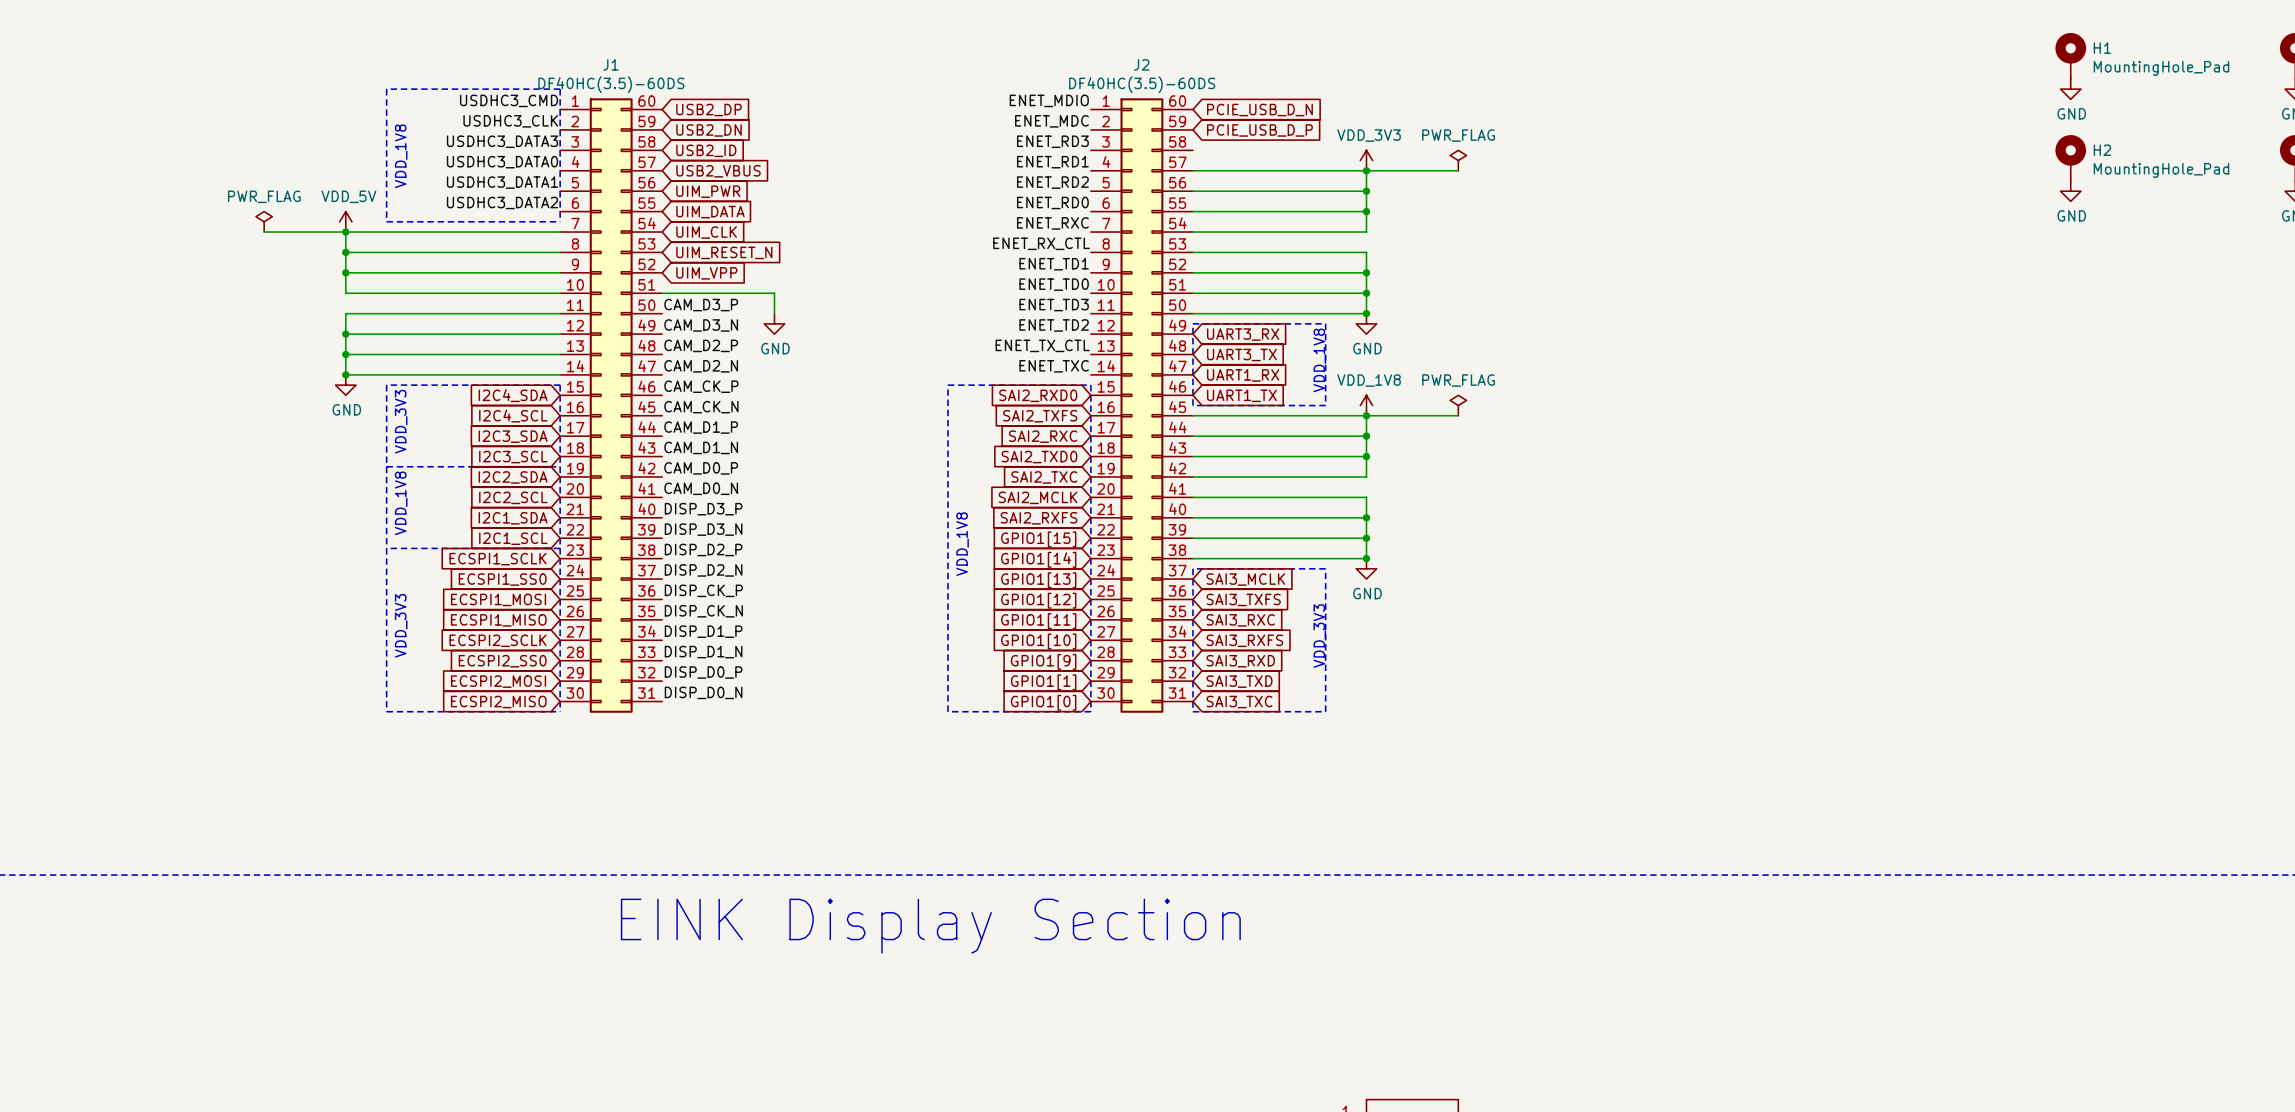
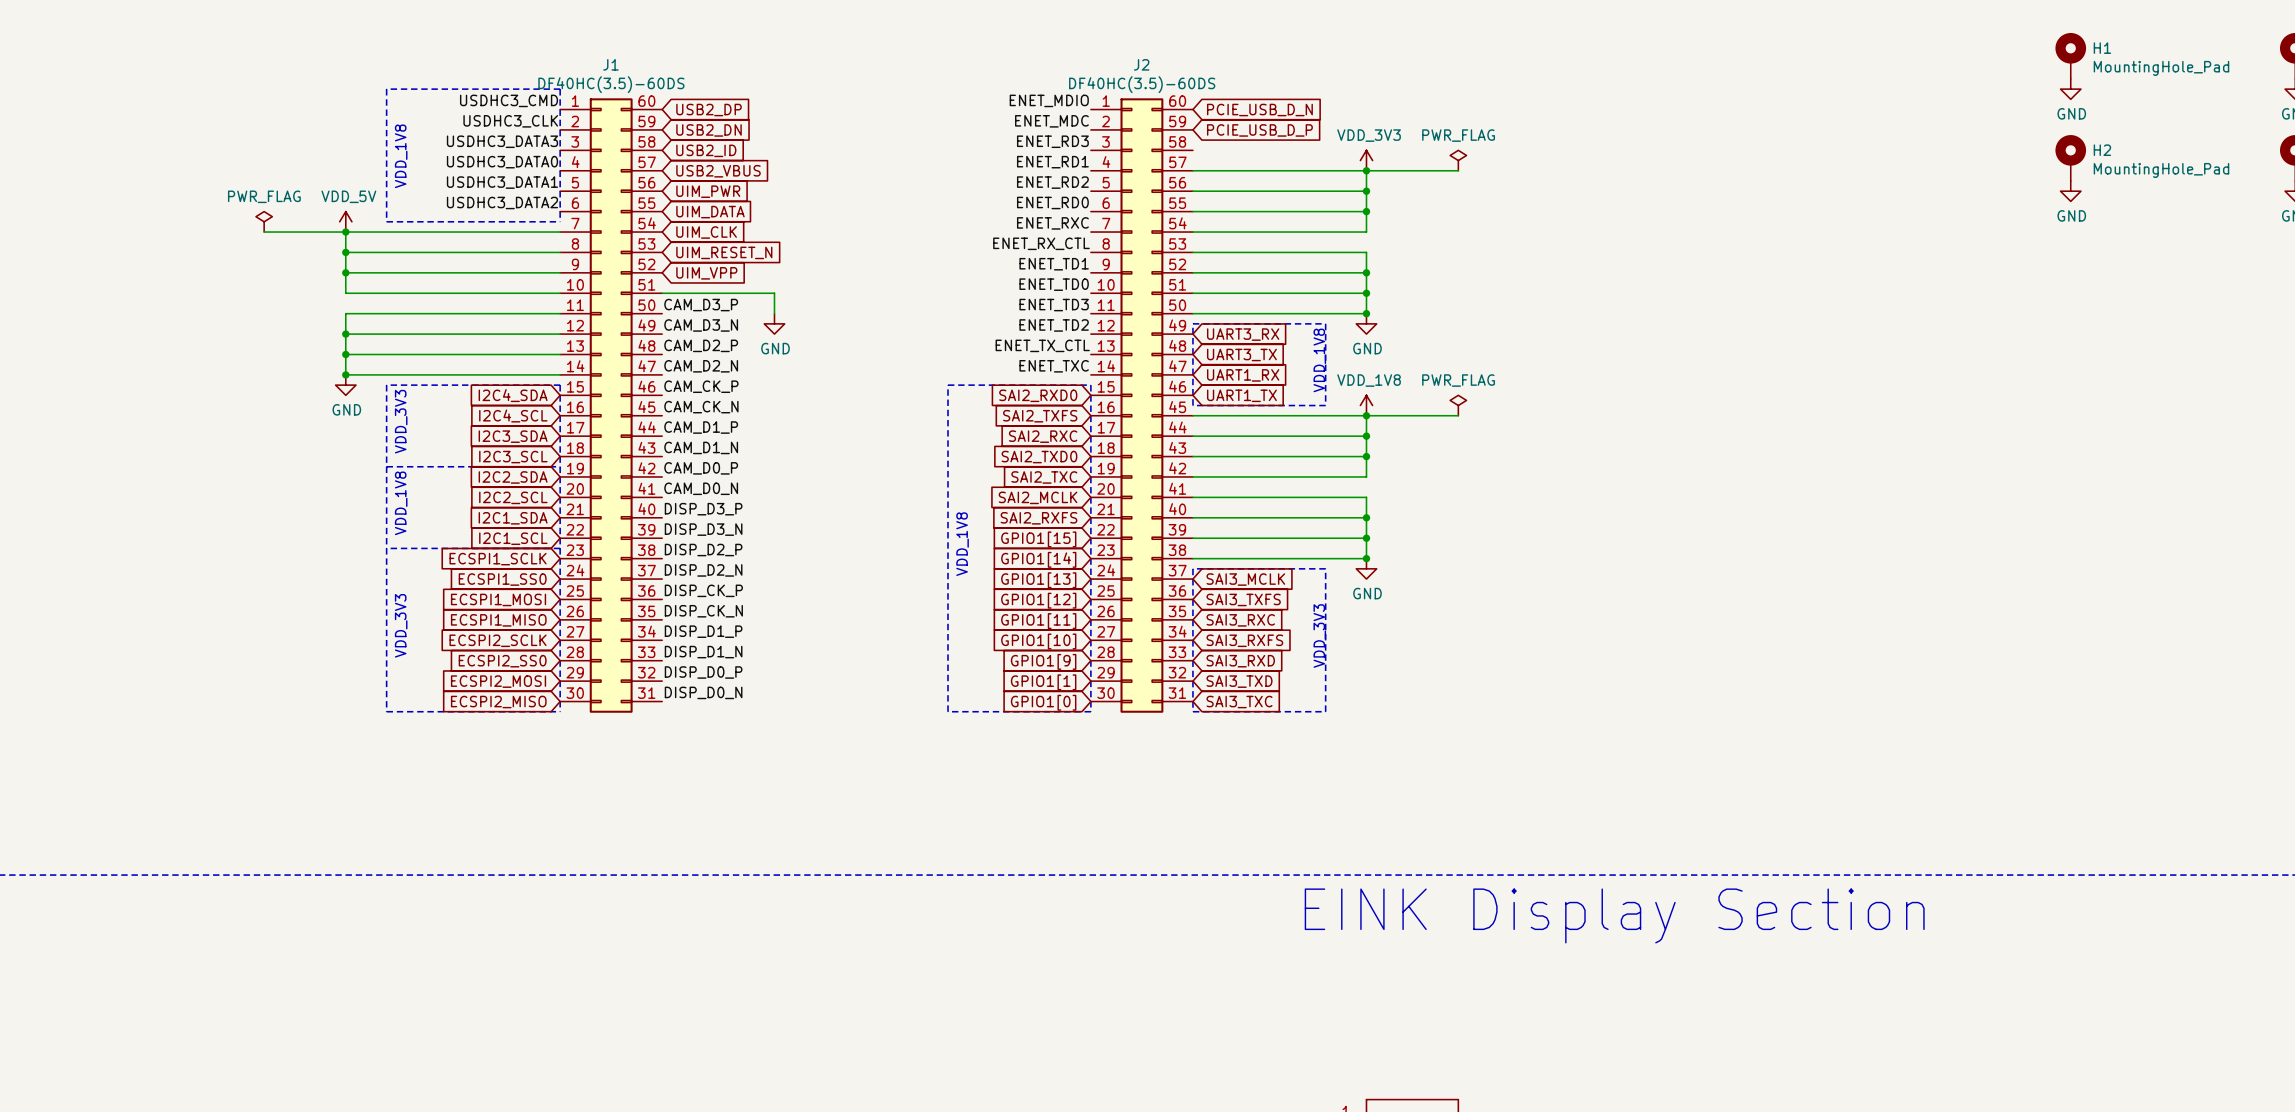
text: none -> EINK Display Section (1614, 915)
text: EINK Display Section (930, 926) -> none

